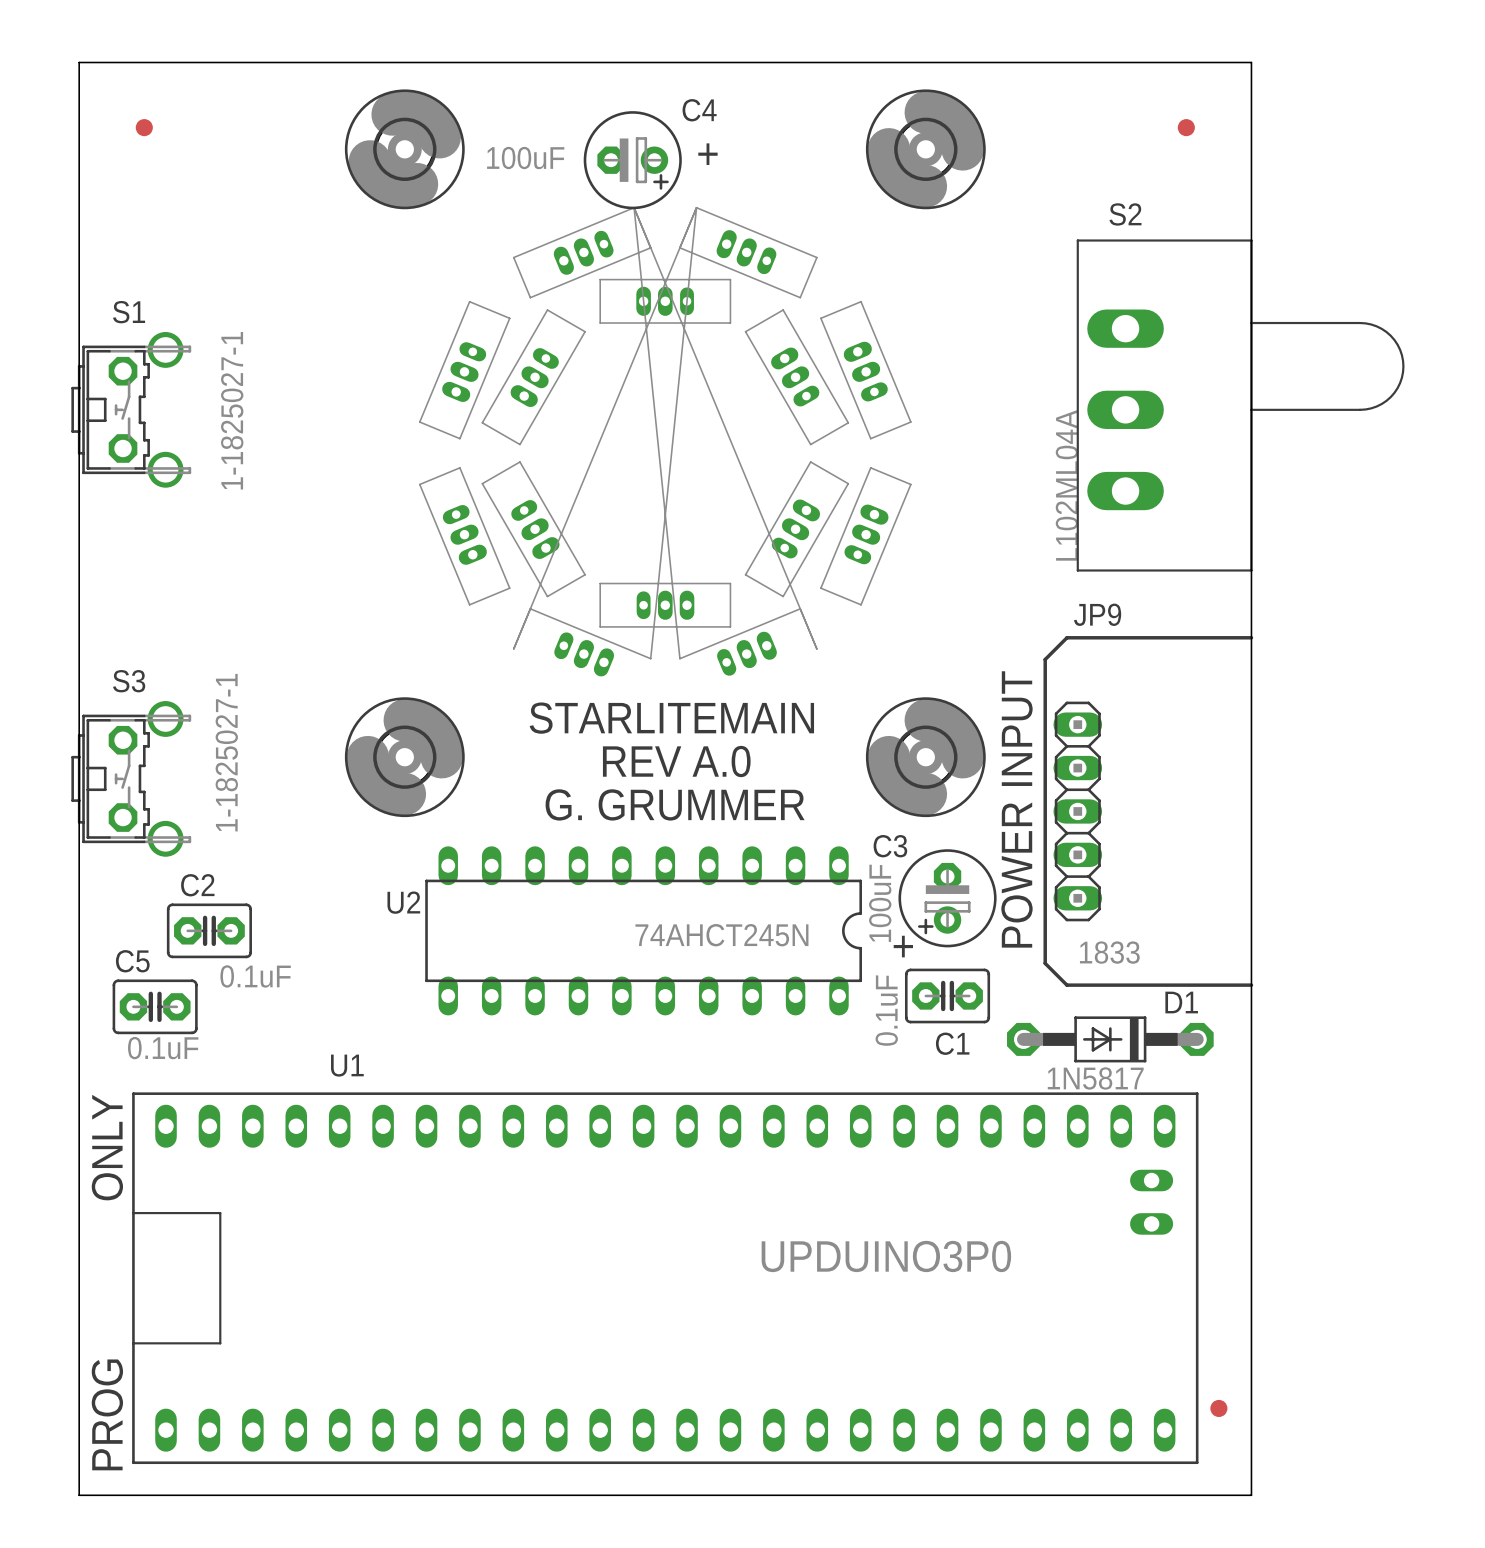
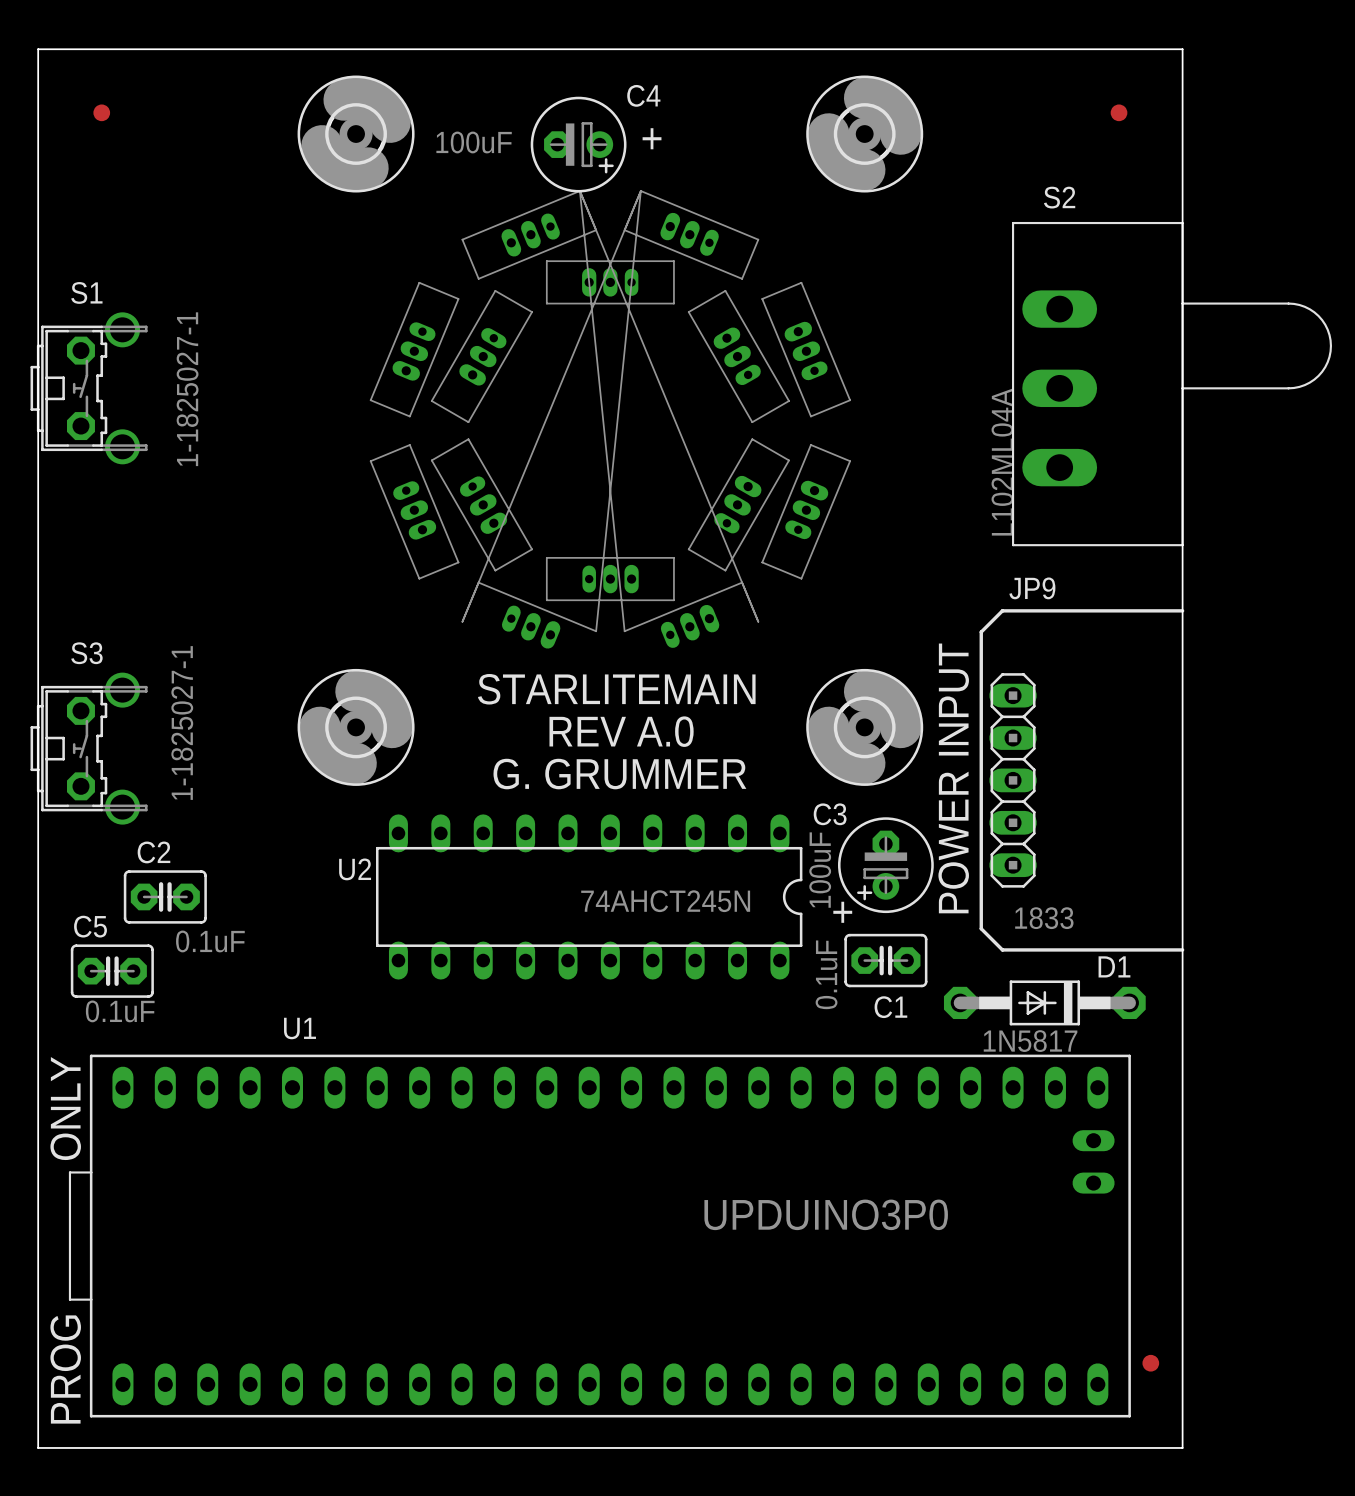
U1 footprint: [132, 1092, 1199, 1465] -> [68, 1054, 1131, 1418]

